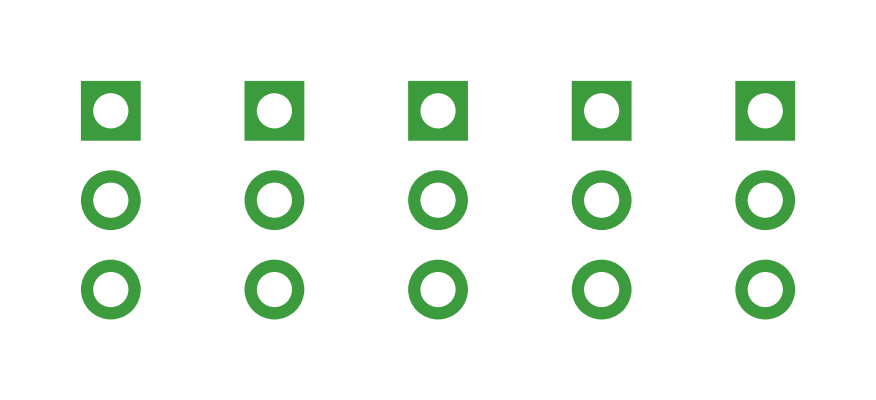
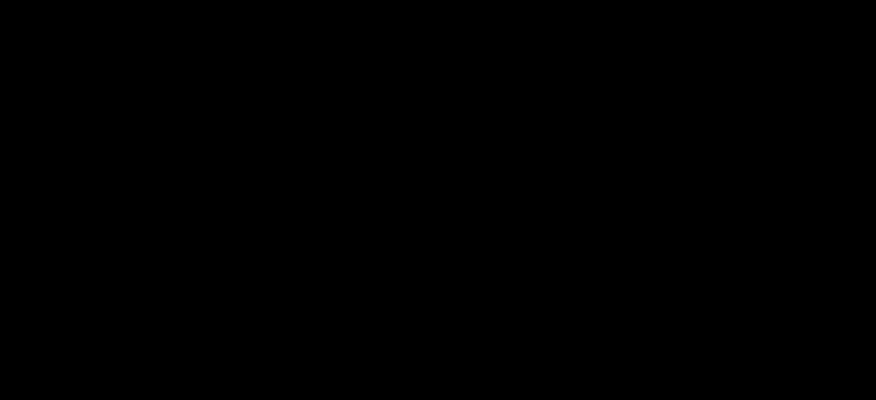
part: (110, 200) -> none
part: (274, 200) -> none
part: (438, 200) -> none
part: (601, 200) -> none
part: (765, 200) -> none

